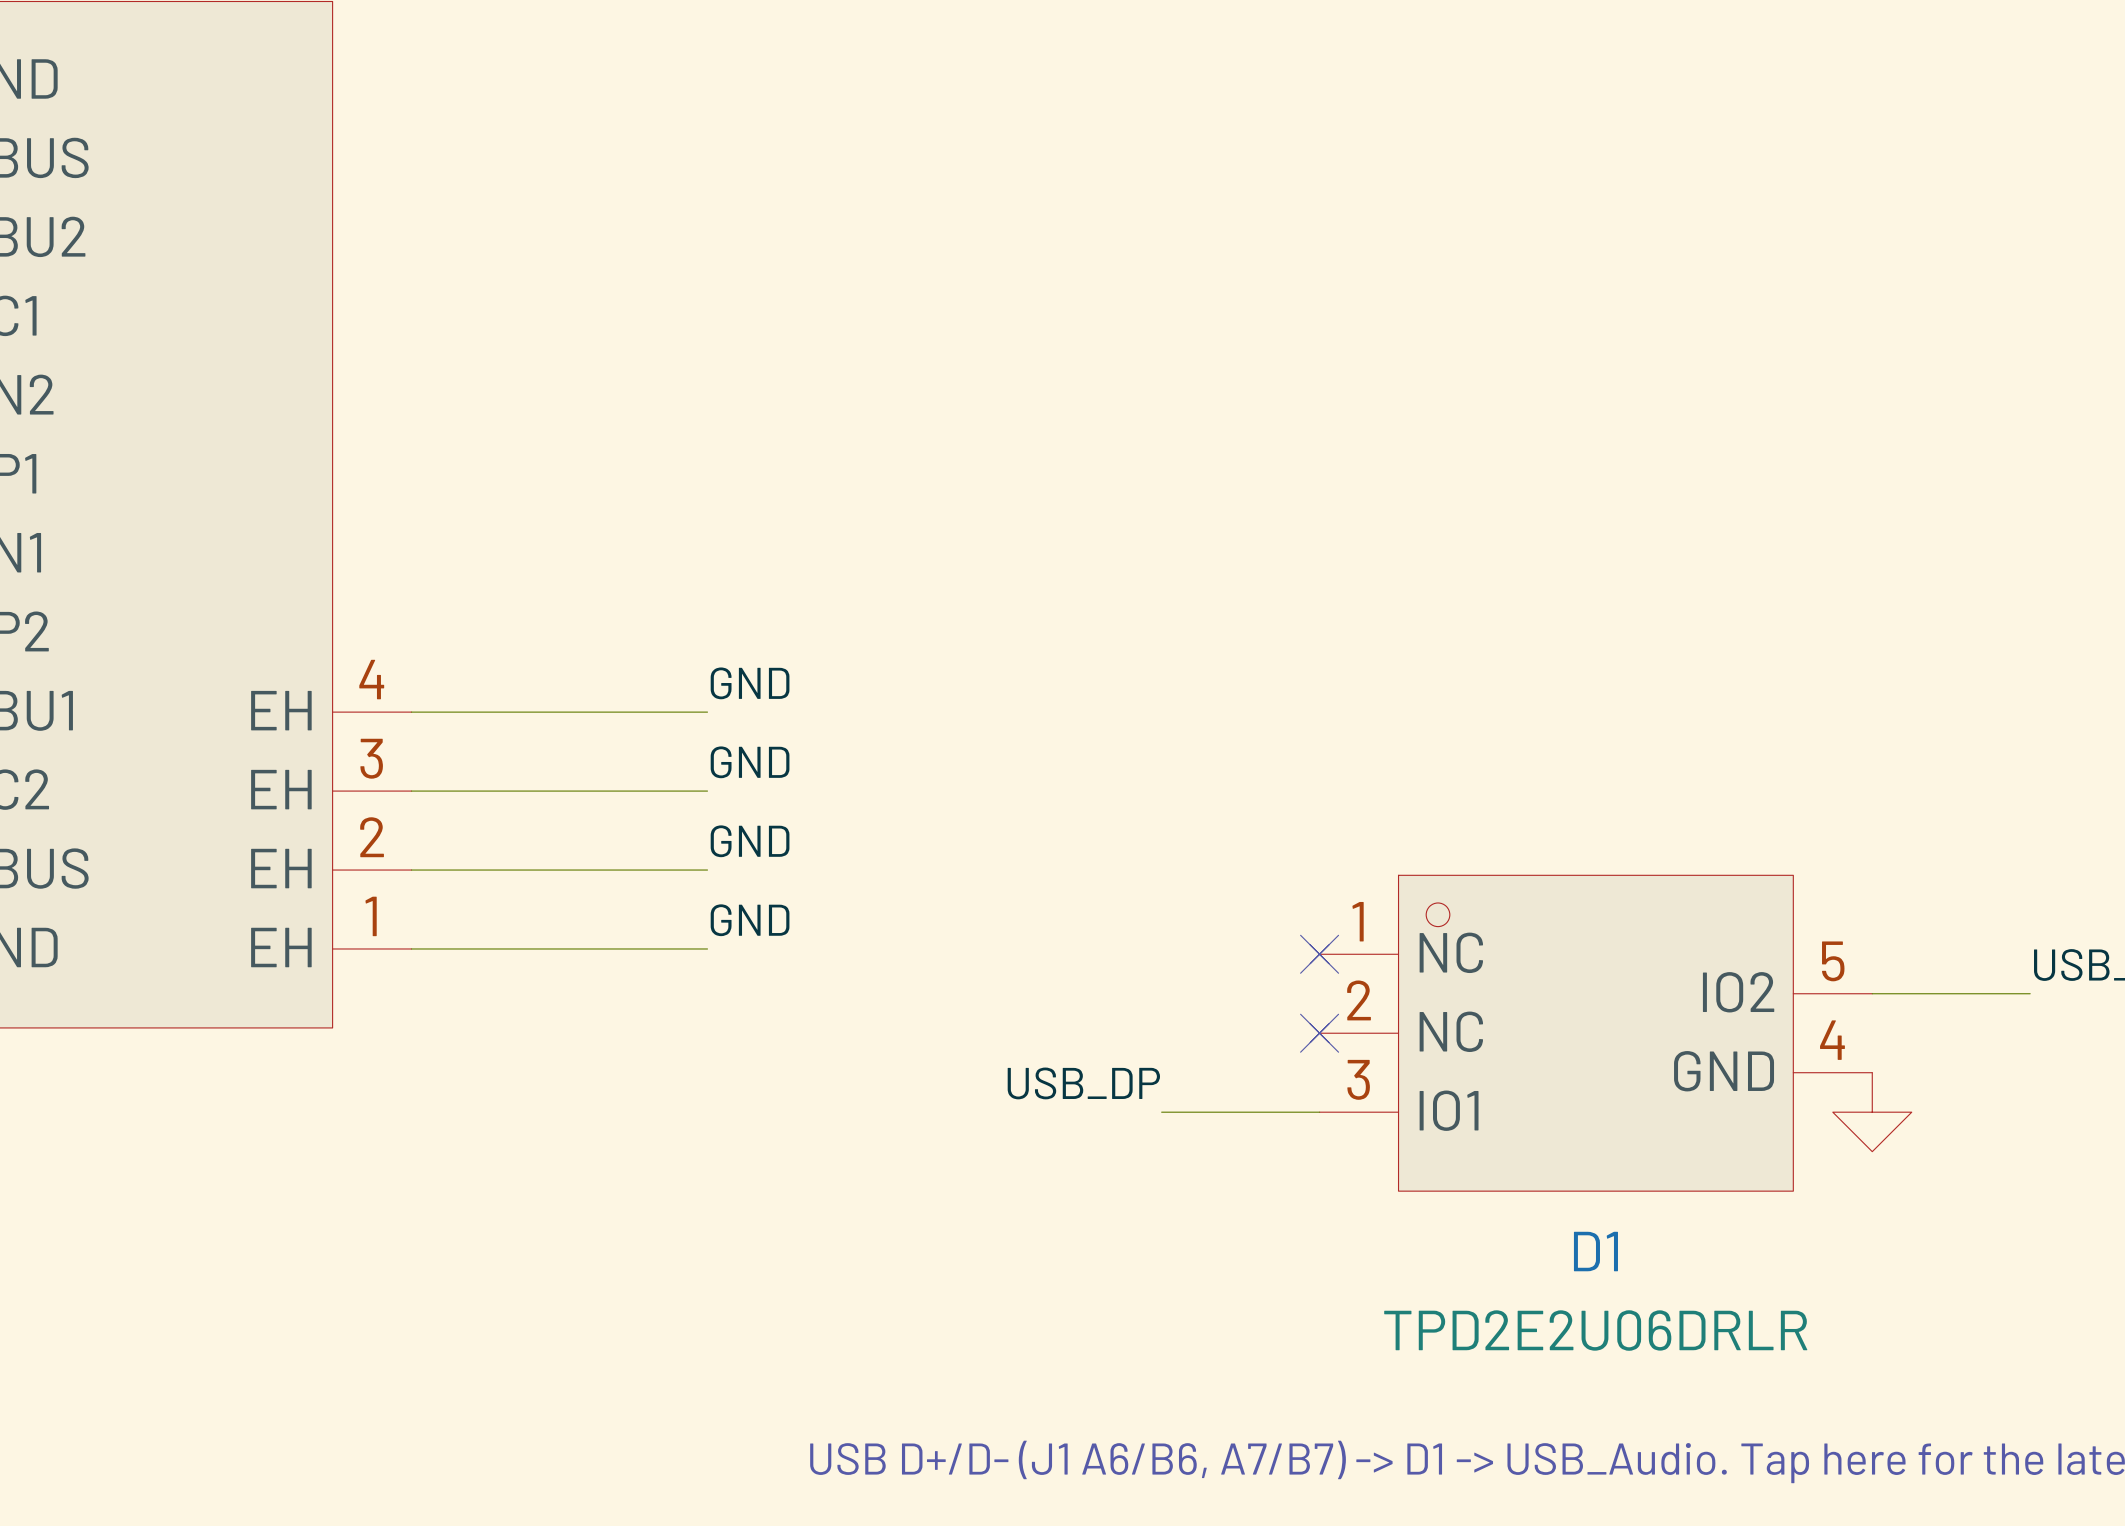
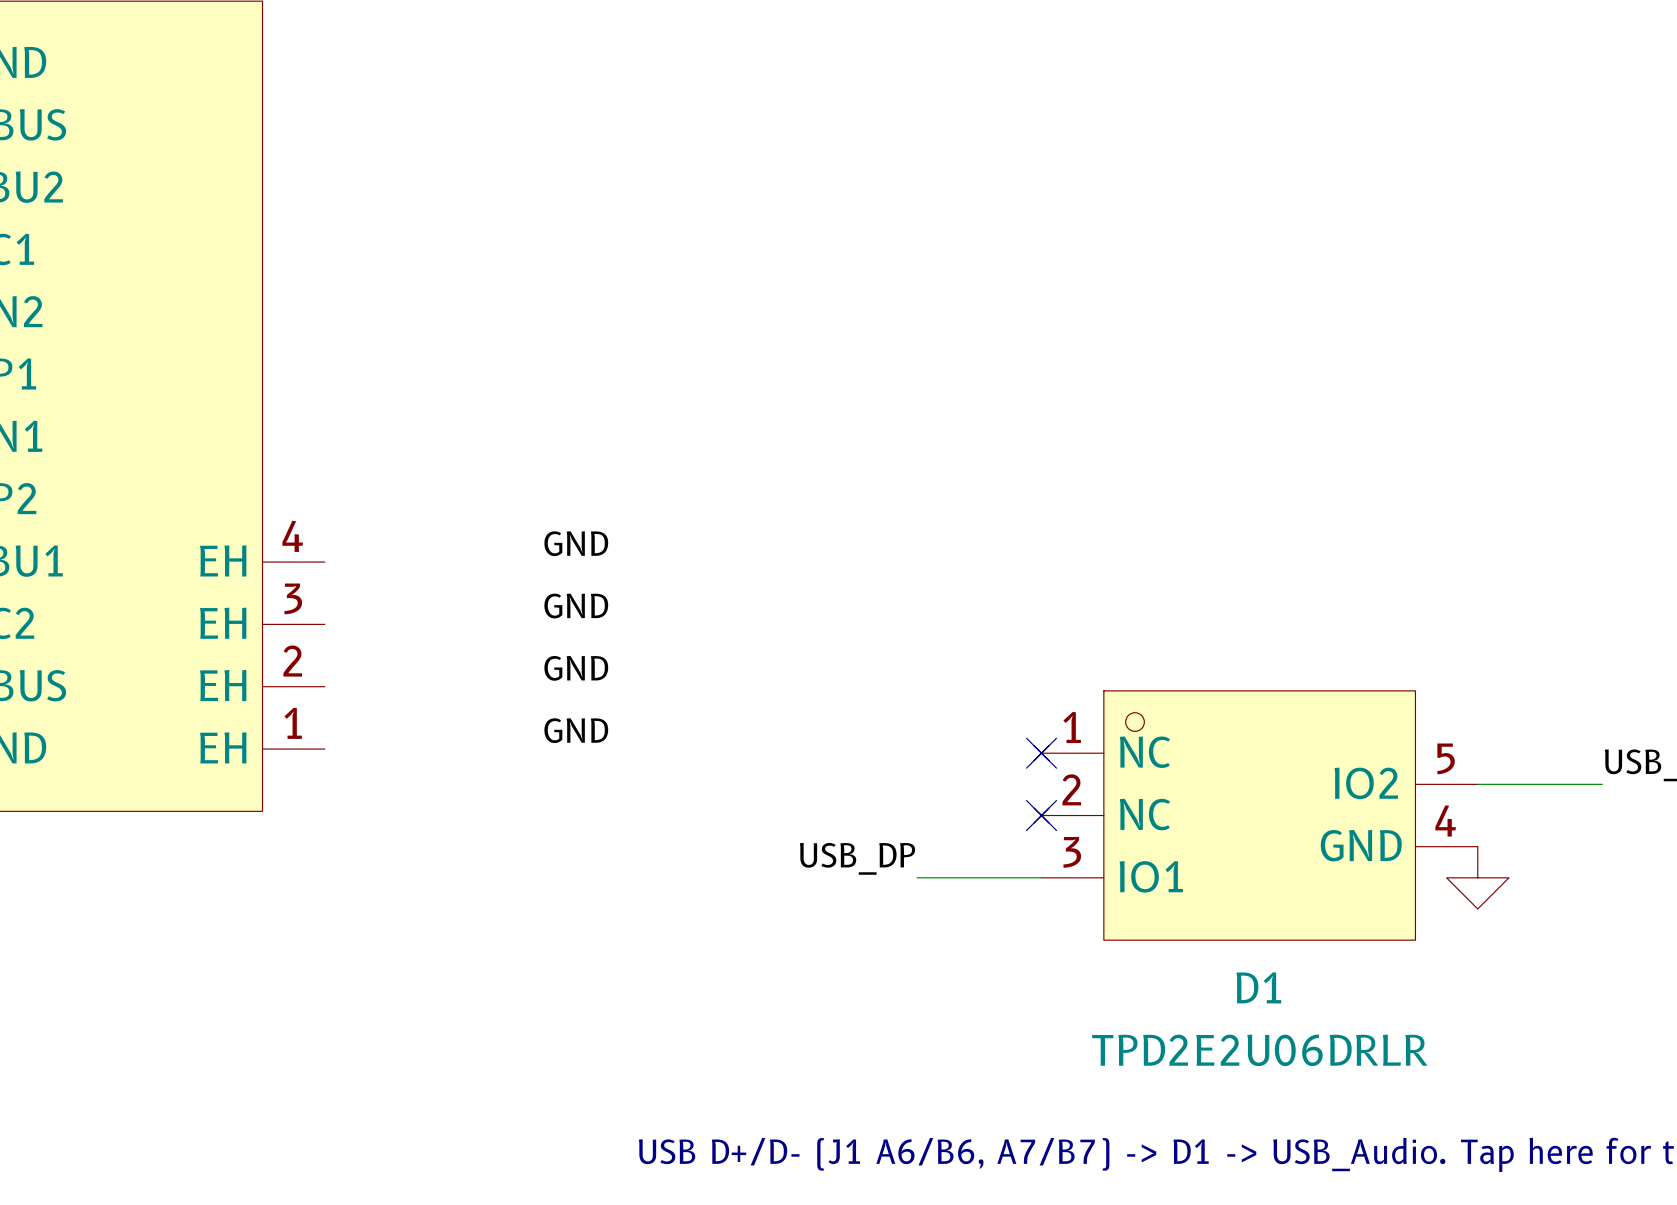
label position: GND (750, 683) -> GND (576, 543)
wire: (411, 712) (707, 712) -> none
label position: GND (750, 762) -> GND (576, 606)
wire: (411, 791) (707, 791) -> none
label position: GND (750, 841) -> GND (576, 668)
wire: (411, 870) (707, 870) -> none
label position: GND (750, 920) -> GND (576, 730)
wire: (411, 948) (707, 948) -> none

